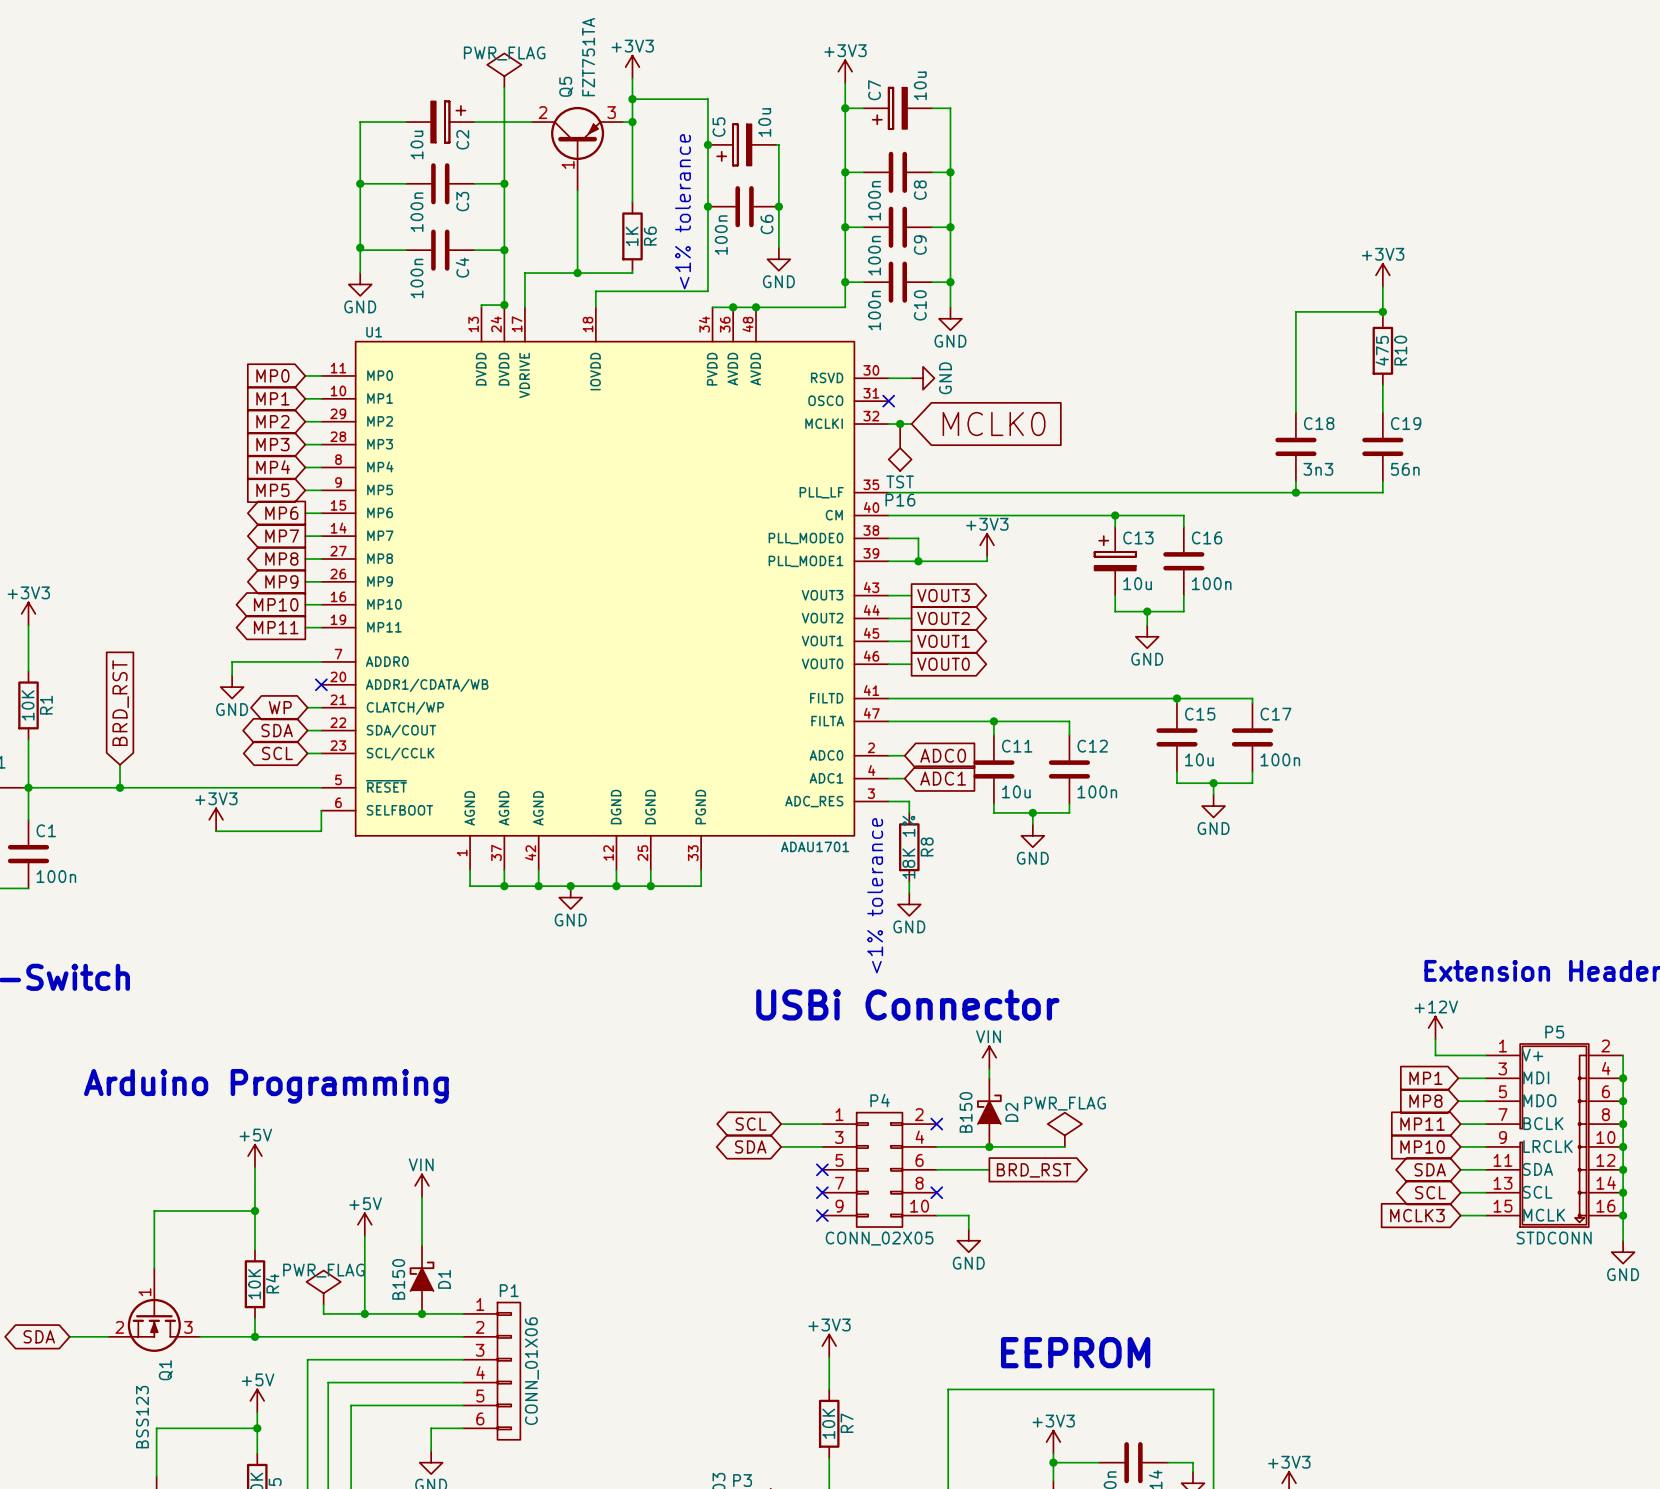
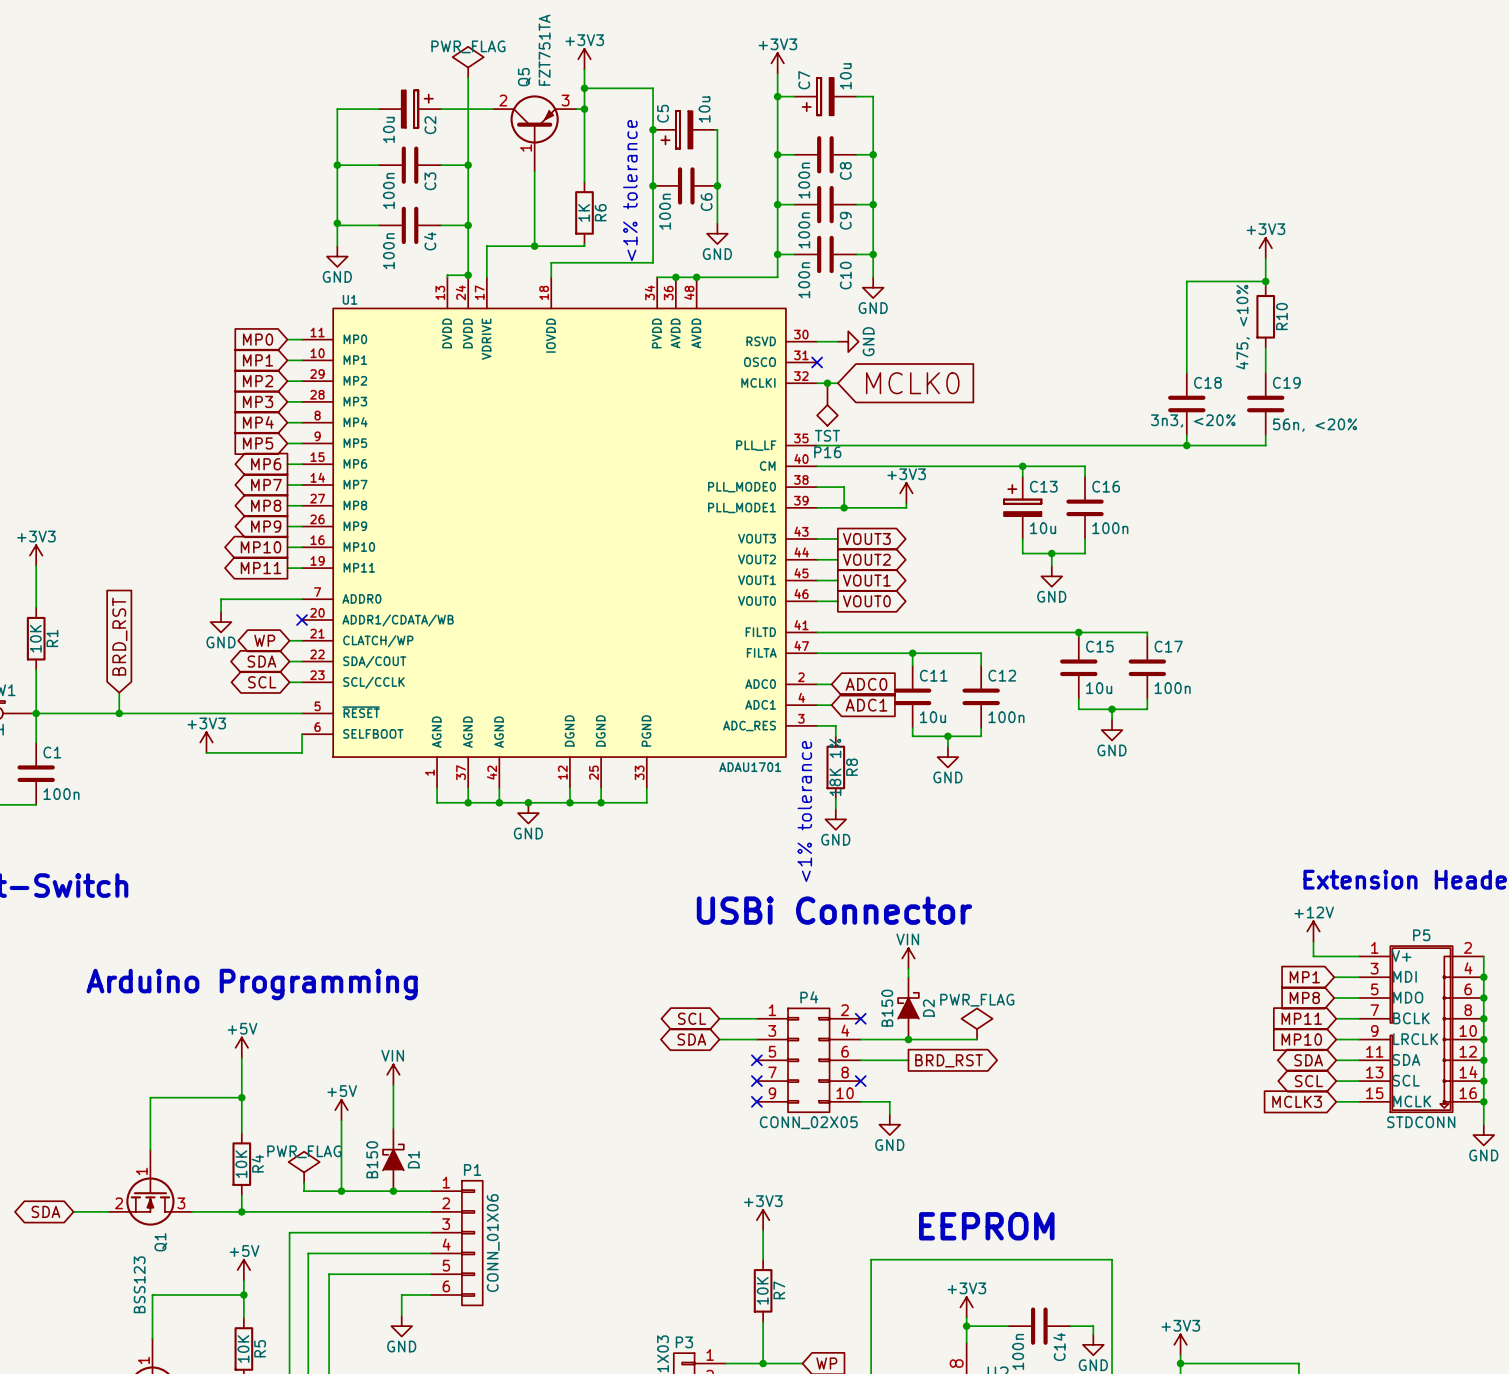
R10 value: 475 (1382, 350) -> 475, <10% (1242, 327)
C18 value: 3n3 (1318, 469) -> 3n3, <20% (1193, 420)
C19 value: 56n (1405, 469) -> 56n, <20% (1314, 425)

